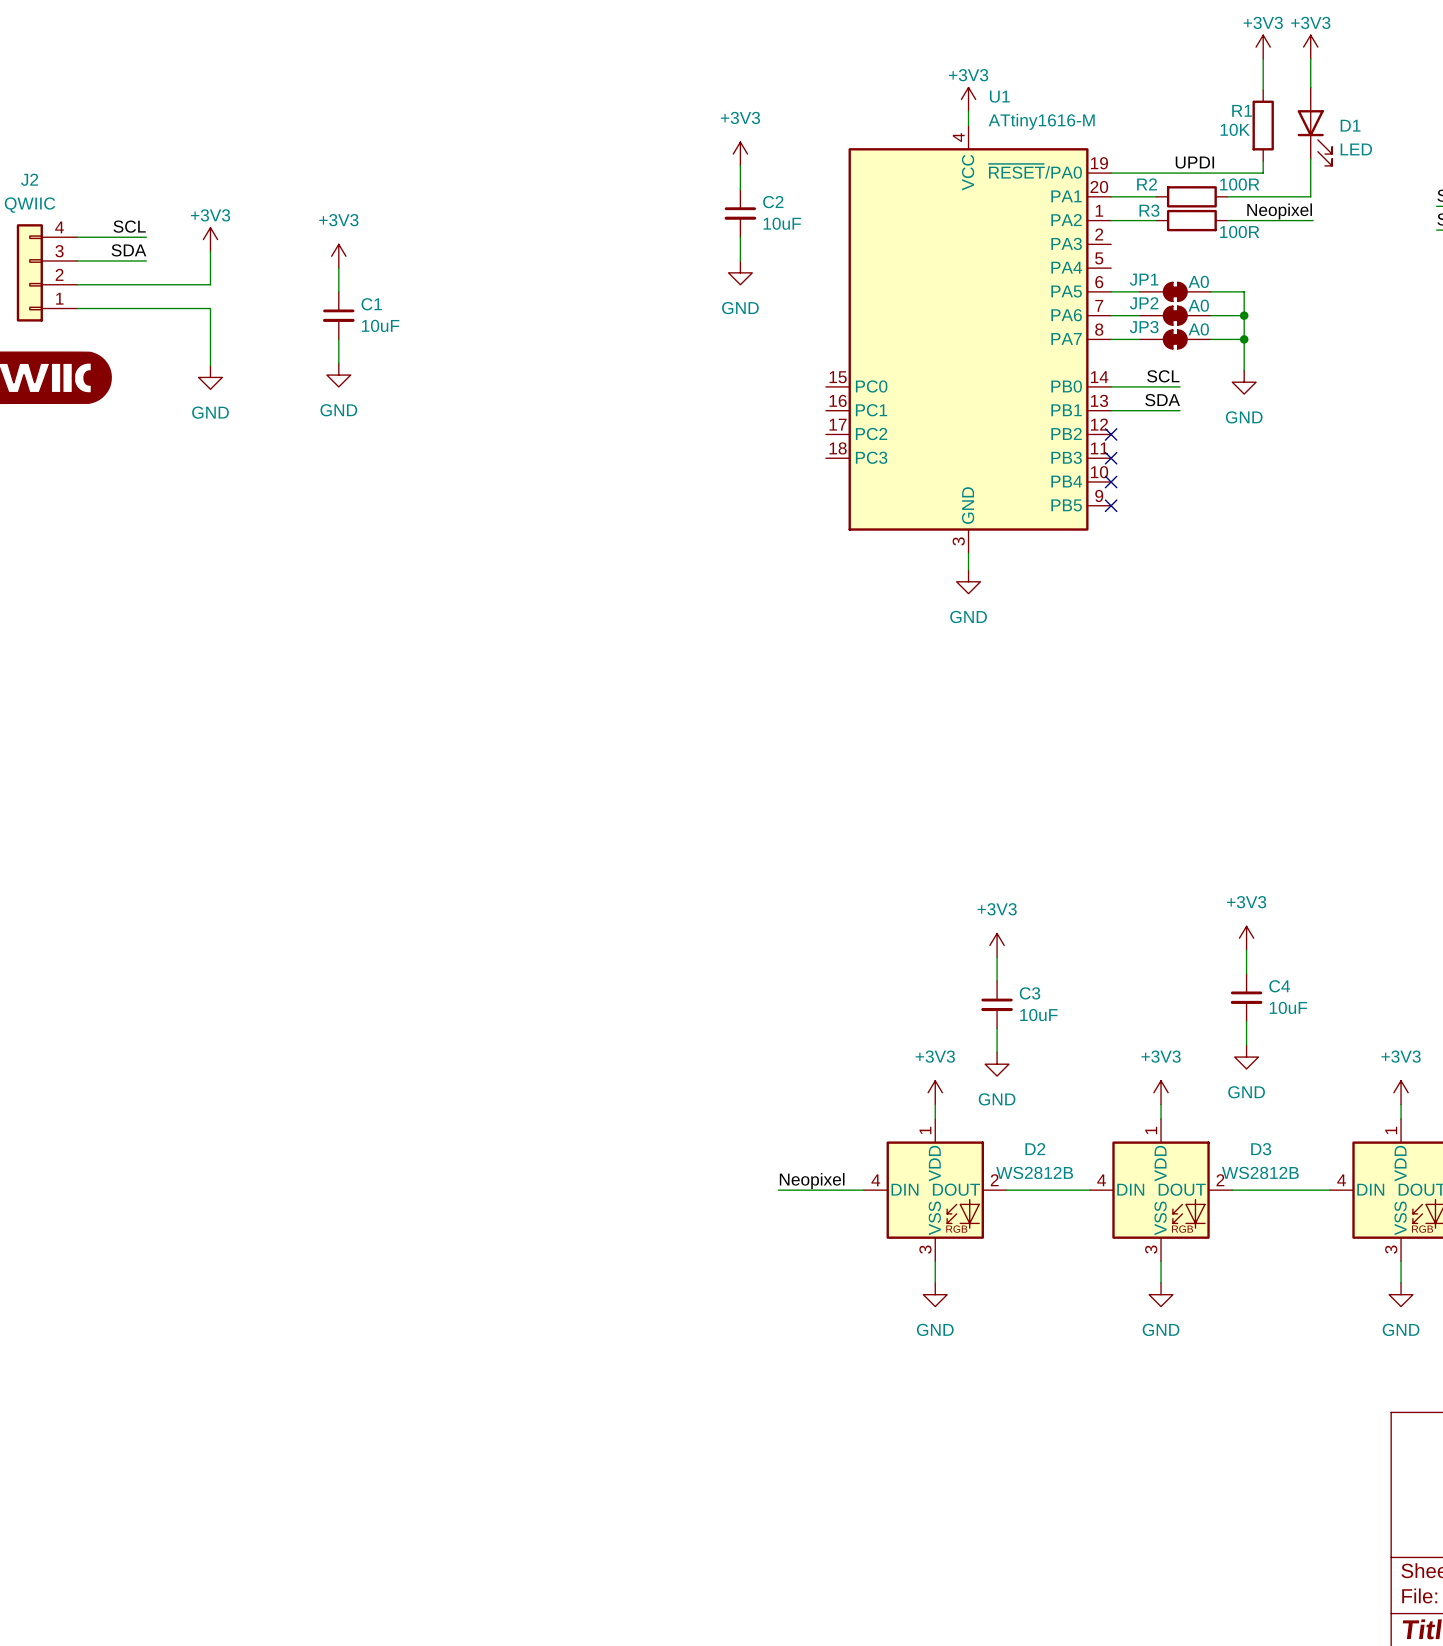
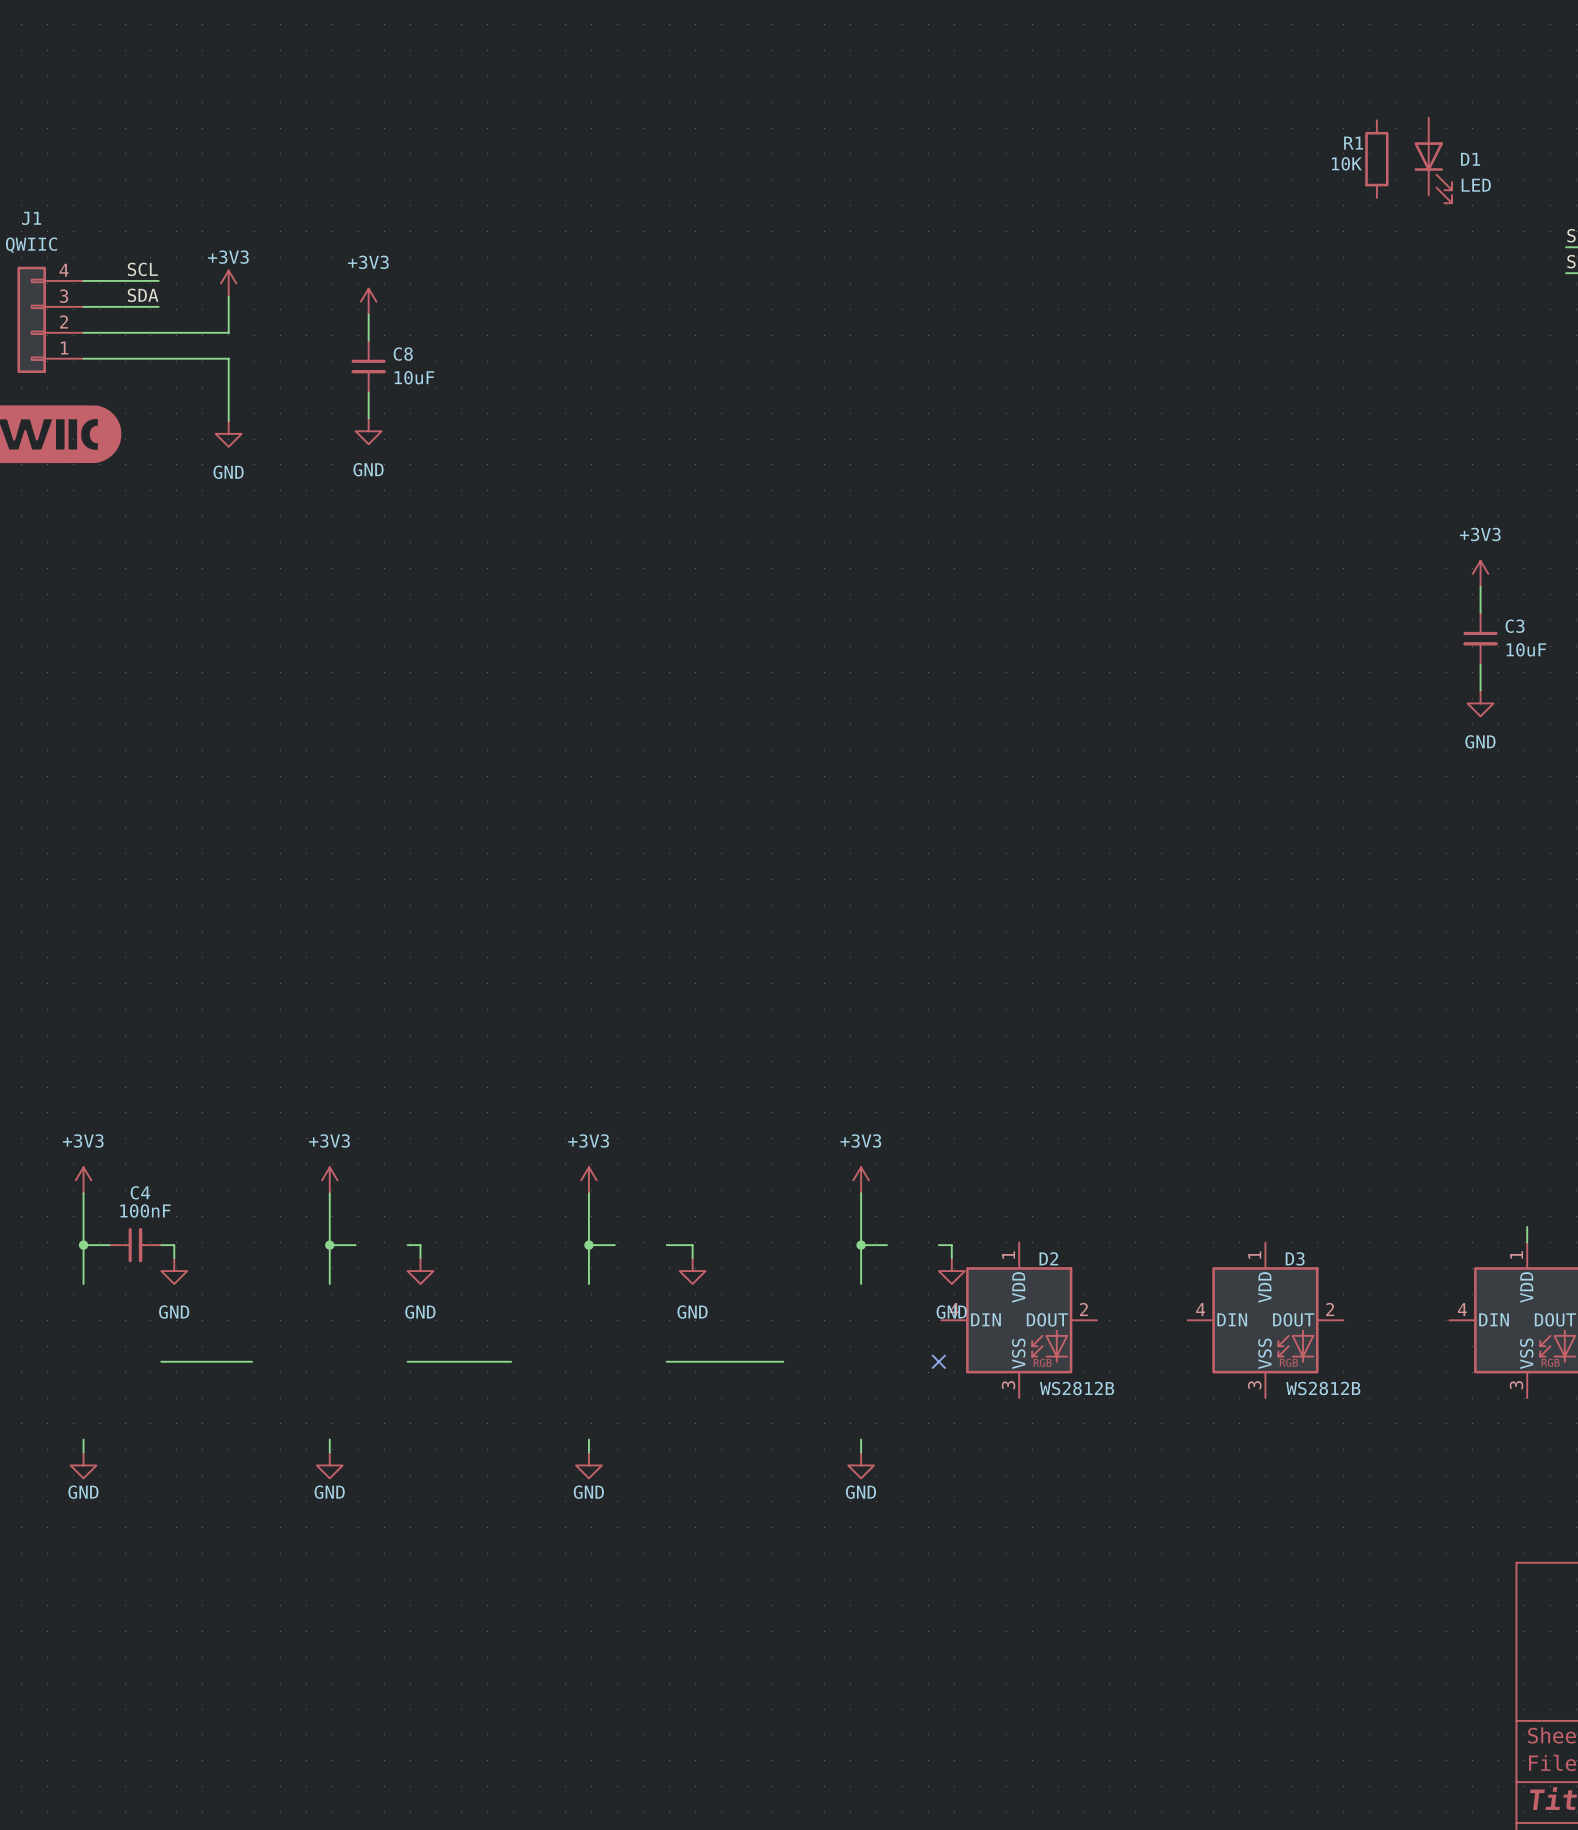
power symbol: +3V3 (1263, 47) -> none
power symbol: +3V3 (1310, 47) -> none
wire: (1263, 59) (1263, 89) -> none
wire: (1310, 59) (1310, 87) -> none
power symbol: +3V3 (968, 99) -> none
wire: (968, 111) (968, 125) -> none
power symbol: +3V3 (740, 154) -> none
wire: (1310, 158) (1310, 196) (1227, 196) -> none
wire: (1263, 161) (1263, 173) (1111, 173) -> none
label: UPDI (1194, 162) -> none
wire: (740, 165) (740, 189) -> none
J2 name: J2 (29, 179) -> J1 (31, 218)
wire: (1111, 196) (1156, 196) -> none
R2: 100R (1191, 196) -> none
label: Neopixel (1279, 211) -> none
C2: 10uF (740, 213) -> none
wire: (1111, 220) (1156, 220) -> none
R3: 100R (1191, 220) -> none
wire: (1227, 220) (1313, 220) -> none
wire: (740, 237) (740, 260) -> none
power symbol: GND (740, 272) -> none
wire: (1111, 291) (1139, 291) -> none
JP1: A0 (1175, 291) -> none
wire: (1210, 291) (1244, 291) (1244, 370) -> none
C1 name: C1 (371, 304) -> C8 (403, 354)
wire: (1111, 315) (1139, 315) -> none
JP2: A0 (1175, 315) -> none
wire: (1210, 315) (1244, 315) -> none
junction: (1244, 315) -> none
U1: ATtiny1616-M (968, 339) -> none
wire: (1111, 339) (1139, 339) -> none
JP3: A0 (1175, 339) -> none
wire: (1210, 339) (1244, 339) -> none
junction: (1244, 339) -> none
label: SCL (1163, 376) -> none
power symbol: GND (1244, 382) -> none
wire: (1111, 386) (1180, 386) -> none
label: SDA (1162, 400) -> none
wire: (1111, 410) (1180, 410) -> none
no-connect mark: (1111, 434) -> none
no-connect mark: (1111, 458) -> none
no-connect mark: (1111, 481) -> none
no-connect mark: (1111, 505) -> none
power symbol: none -> +3V3 (1480, 573)
wire: none -> (1480, 586) (1480, 612)
wire: (968, 553) (968, 569) -> none
power symbol: GND (968, 581) -> none
wire: none -> (1480, 664) (1480, 690)
power symbol: none -> GND (1480, 703)
power symbol: +3V3 (1246, 938) -> none
power symbol: +3V3 (997, 945) -> none
wire: (1246, 950) (1246, 973) -> none
wire: (997, 957) (997, 981) -> none
C4 rotation: 0° (1246, 997) -> 90° counterclockwise (135, 1245)
C4 position: (1246, 997) -> (135, 1245)
C3 position: (997, 1004) -> (1480, 638)
C4 value: 10uF (1288, 1007) -> 100nF (145, 1210)
wire: (1246, 1021) (1246, 1045) -> none
wire: (997, 1028) (997, 1052) -> none
power symbol: GND (1246, 1057) -> none
power symbol: none -> +3V3 (83, 1180)
power symbol: none -> +3V3 (329, 1180)
power symbol: none -> +3V3 (588, 1180)
power symbol: none -> +3V3 (861, 1180)
power symbol: GND (997, 1064) -> none
wire: none -> (83, 1193) (83, 1284)
wire: none -> (329, 1193) (329, 1284)
wire: none -> (588, 1193) (588, 1284)
wire: none -> (861, 1193) (861, 1284)
power symbol: +3V3 (935, 1092) -> none
power symbol: +3V3 (1161, 1092) -> none
power symbol: +3V3 (1401, 1092) -> none
wire: (935, 1104) (935, 1118) -> none
wire: (1161, 1104) (1161, 1118) -> none
wire: none -> (83, 1245) (109, 1245)
junction: none -> (83, 1245)
wire: none -> (161, 1245) (174, 1245) (174, 1258)
wire: none -> (329, 1245) (355, 1245)
junction: none -> (329, 1245)
wire: none -> (407, 1245) (420, 1245) (420, 1258)
wire: none -> (588, 1245) (614, 1245)
junction: none -> (588, 1245)
wire: none -> (666, 1245) (692, 1245) (692, 1258)
wire: none -> (861, 1245) (887, 1245)
junction: none -> (861, 1245)
wire: none -> (938, 1245) (951, 1245) (951, 1258)
power symbol: none -> GND (174, 1271)
power symbol: none -> GND (420, 1271)
power symbol: none -> GND (692, 1271)
power symbol: none -> GND (951, 1271)
D2 name position: D2 (1035, 1149) -> D2 (1048, 1258)
D3 name position: D3 (1261, 1149) -> D3 (1295, 1258)
D2 value position: WS2812B (1034, 1172) -> WS2812B (1077, 1388)
D3 value position: WS2812B (1260, 1172) -> WS2812B (1323, 1388)
label: Neopixel (812, 1181) -> none
wire: (778, 1190) (863, 1190) -> none
wire: (1006, 1190) (1089, 1190) -> none
wire: (1232, 1190) (1329, 1190) -> none
wire: none -> (161, 1361) (252, 1361)
wire: none -> (407, 1361) (511, 1361)
wire: none -> (666, 1361) (783, 1361)
no-connect mark: none -> (938, 1361)
wire: (935, 1261) (935, 1282) -> none
wire: (1161, 1261) (1161, 1282) -> none
wire: (1401, 1261) (1401, 1282) -> none
power symbol: GND (935, 1294) -> none
power symbol: GND (1161, 1294) -> none
power symbol: GND (1401, 1294) -> none
wire: none -> (83, 1439) (83, 1452)
wire: none -> (329, 1439) (329, 1452)
wire: none -> (588, 1439) (588, 1452)
wire: none -> (861, 1439) (861, 1452)
power symbol: none -> GND (83, 1465)
power symbol: none -> GND (329, 1465)
power symbol: none -> GND (588, 1465)
power symbol: none -> GND (861, 1465)

